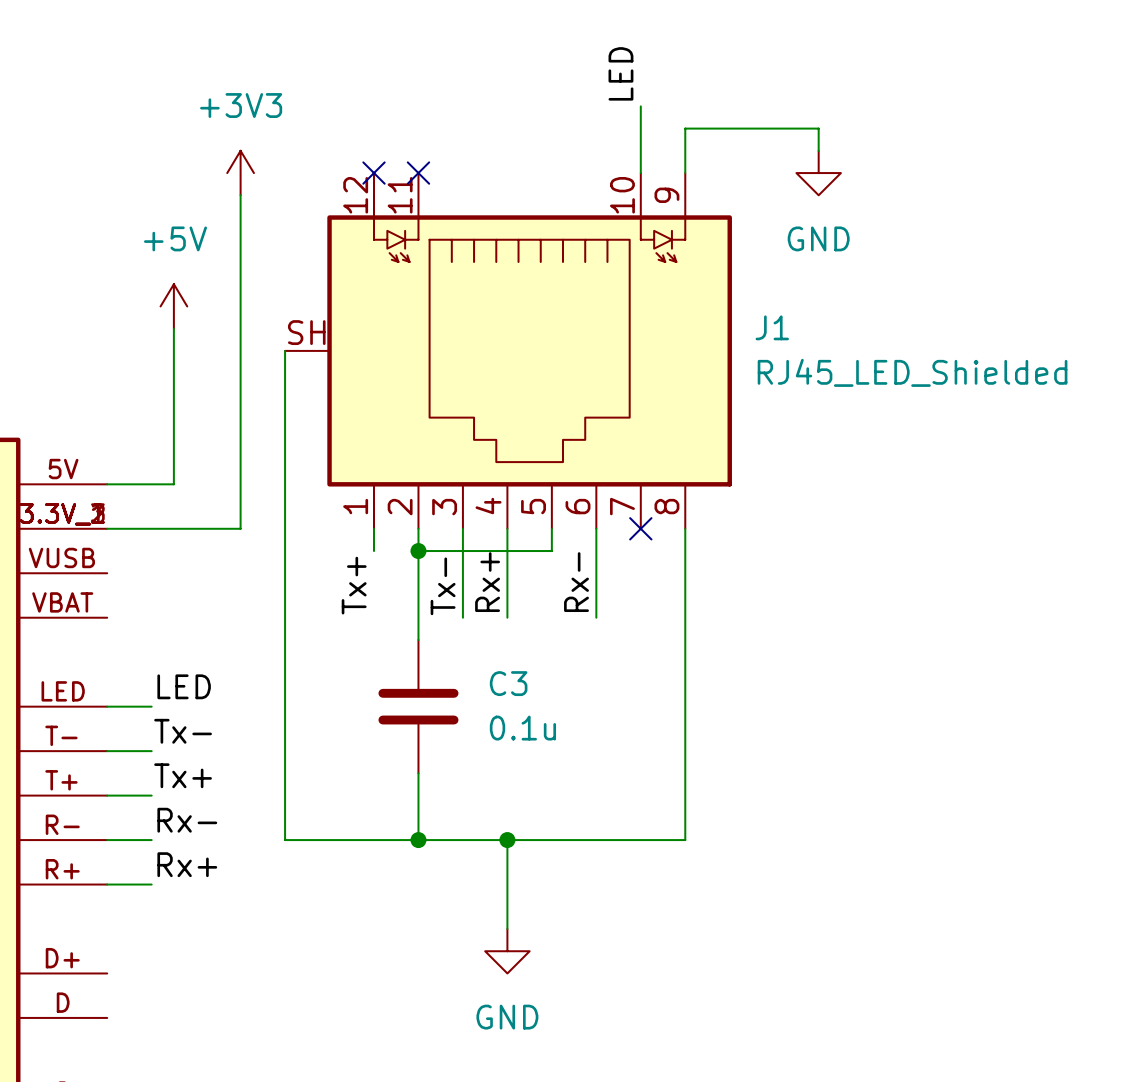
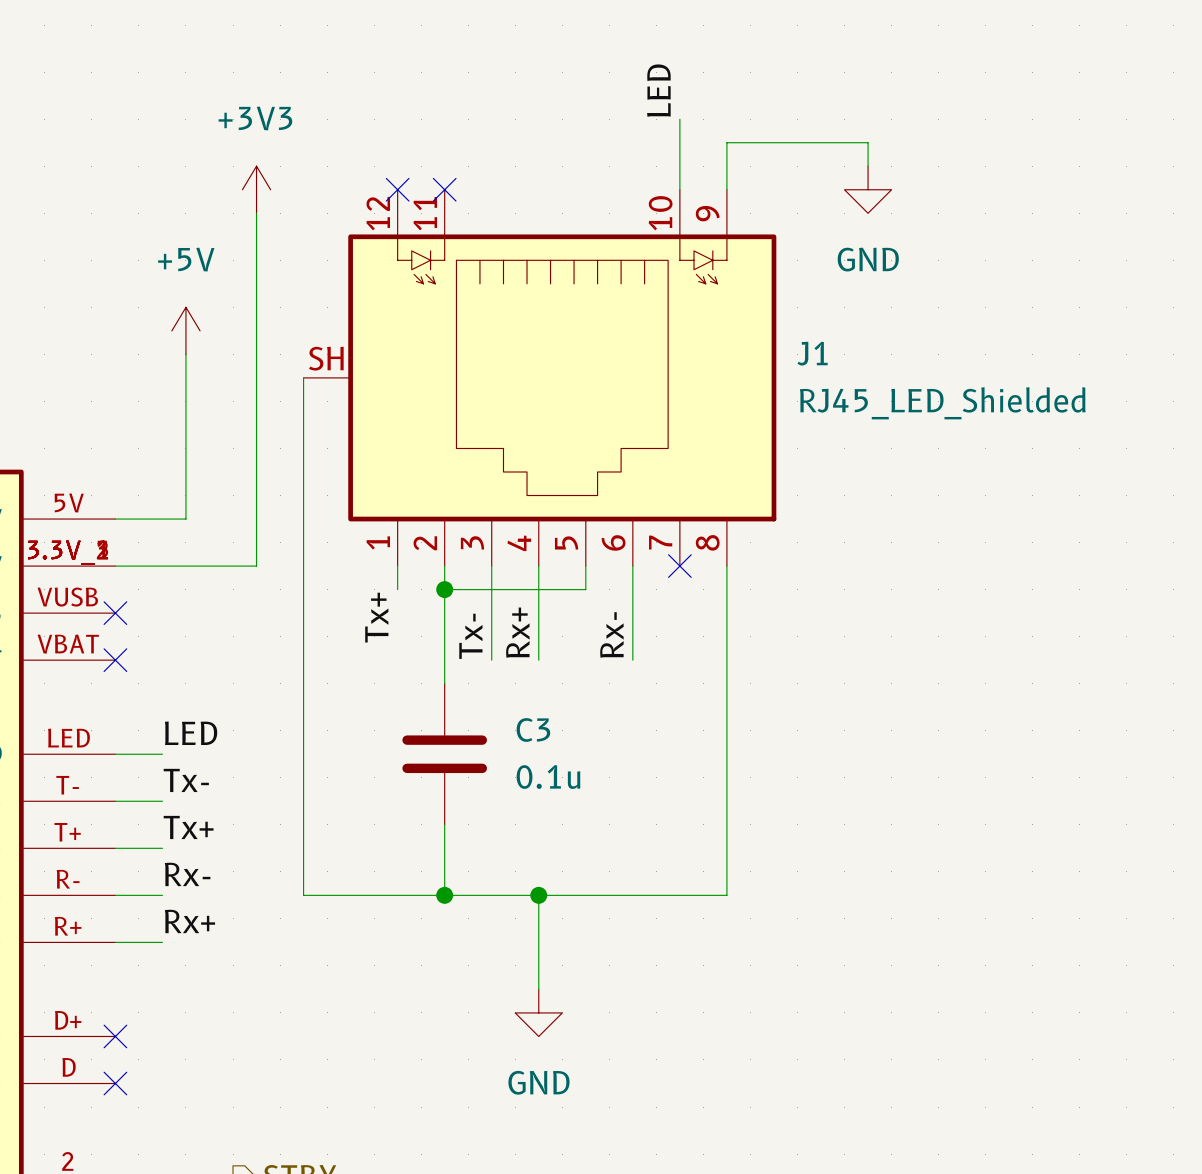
no-connect mark: none -> (115, 613)
no-connect mark: none -> (115, 660)
no-connect mark: none -> (115, 1036)
no-connect mark: none -> (115, 1083)

